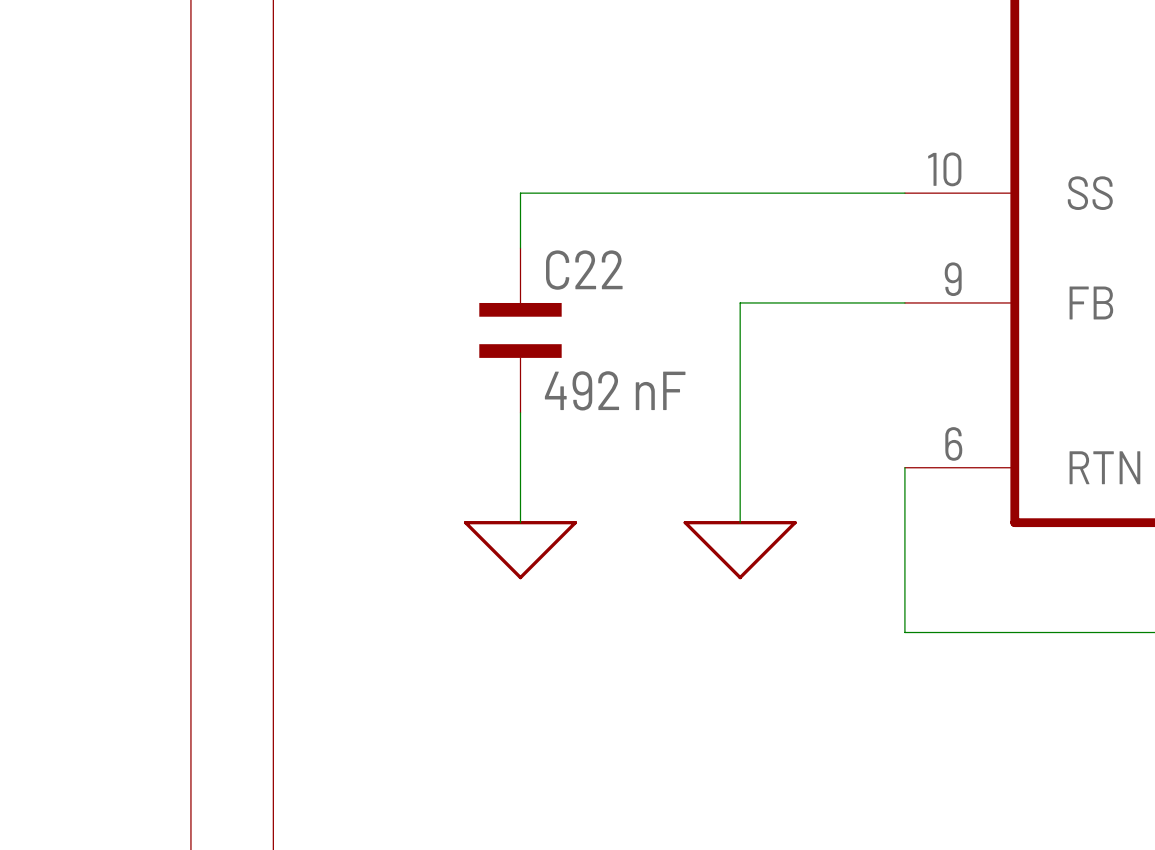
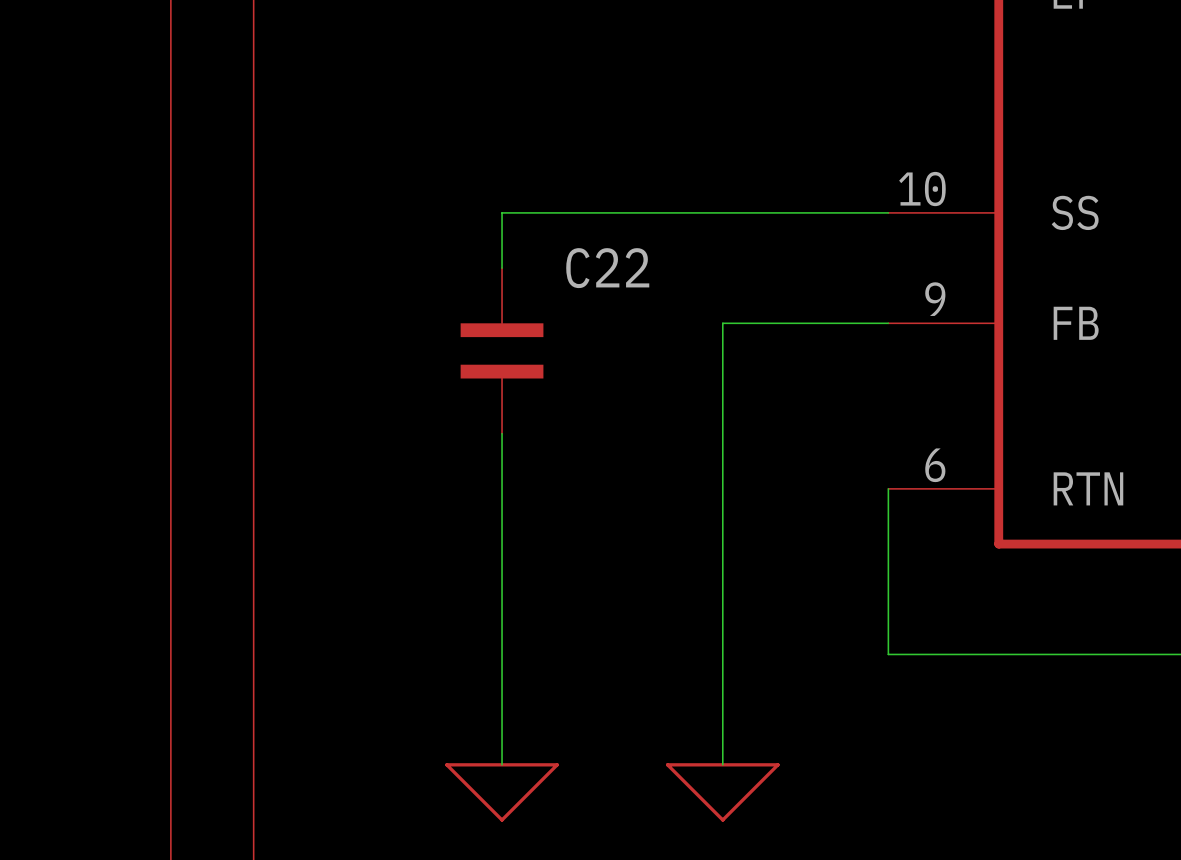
C22 name position: C22 (584, 270) -> C22 (607, 268)
C22 value: 492 nF (615, 390) -> none
wire: none -> (502, 544) (502, 764)
wire: none -> (722, 544) (722, 764)
power symbol: (520, 550) -> none
power symbol: (740, 550) -> none
power symbol: none -> (502, 792)
power symbol: none -> (722, 792)

